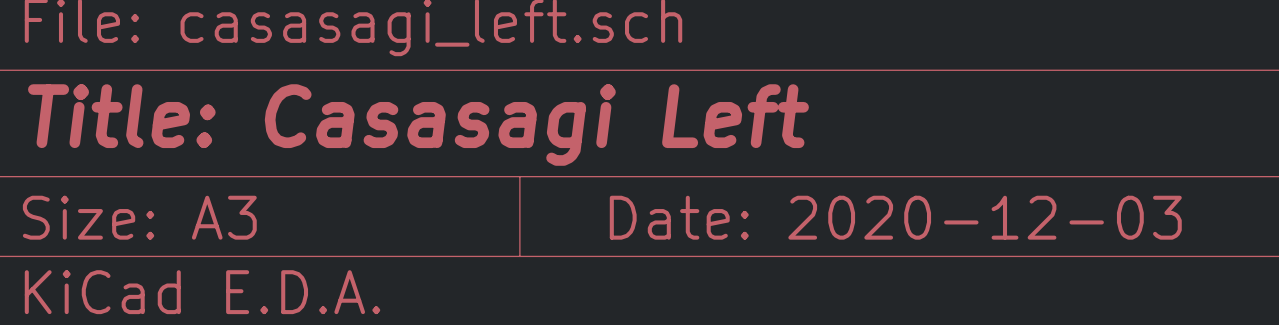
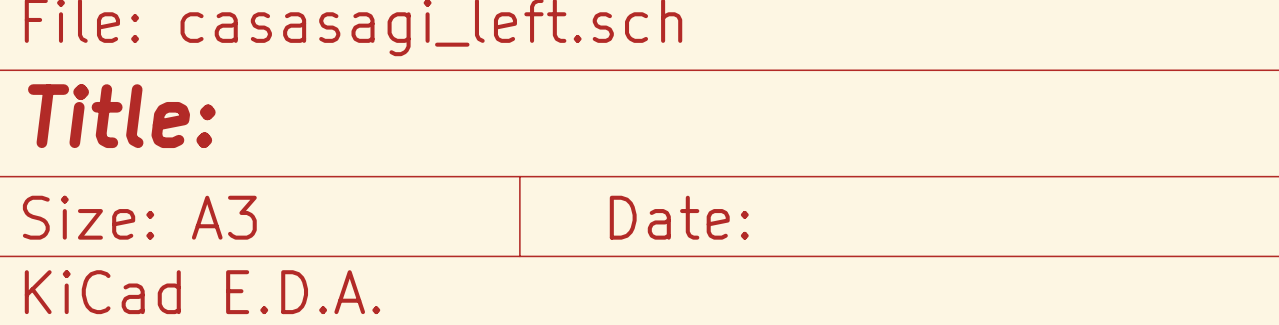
title block: Title: Casasagi Left (418, 125) -> Title: (121, 116)
title block: Date: 2020-12-03 (895, 217) -> Date: (679, 217)

